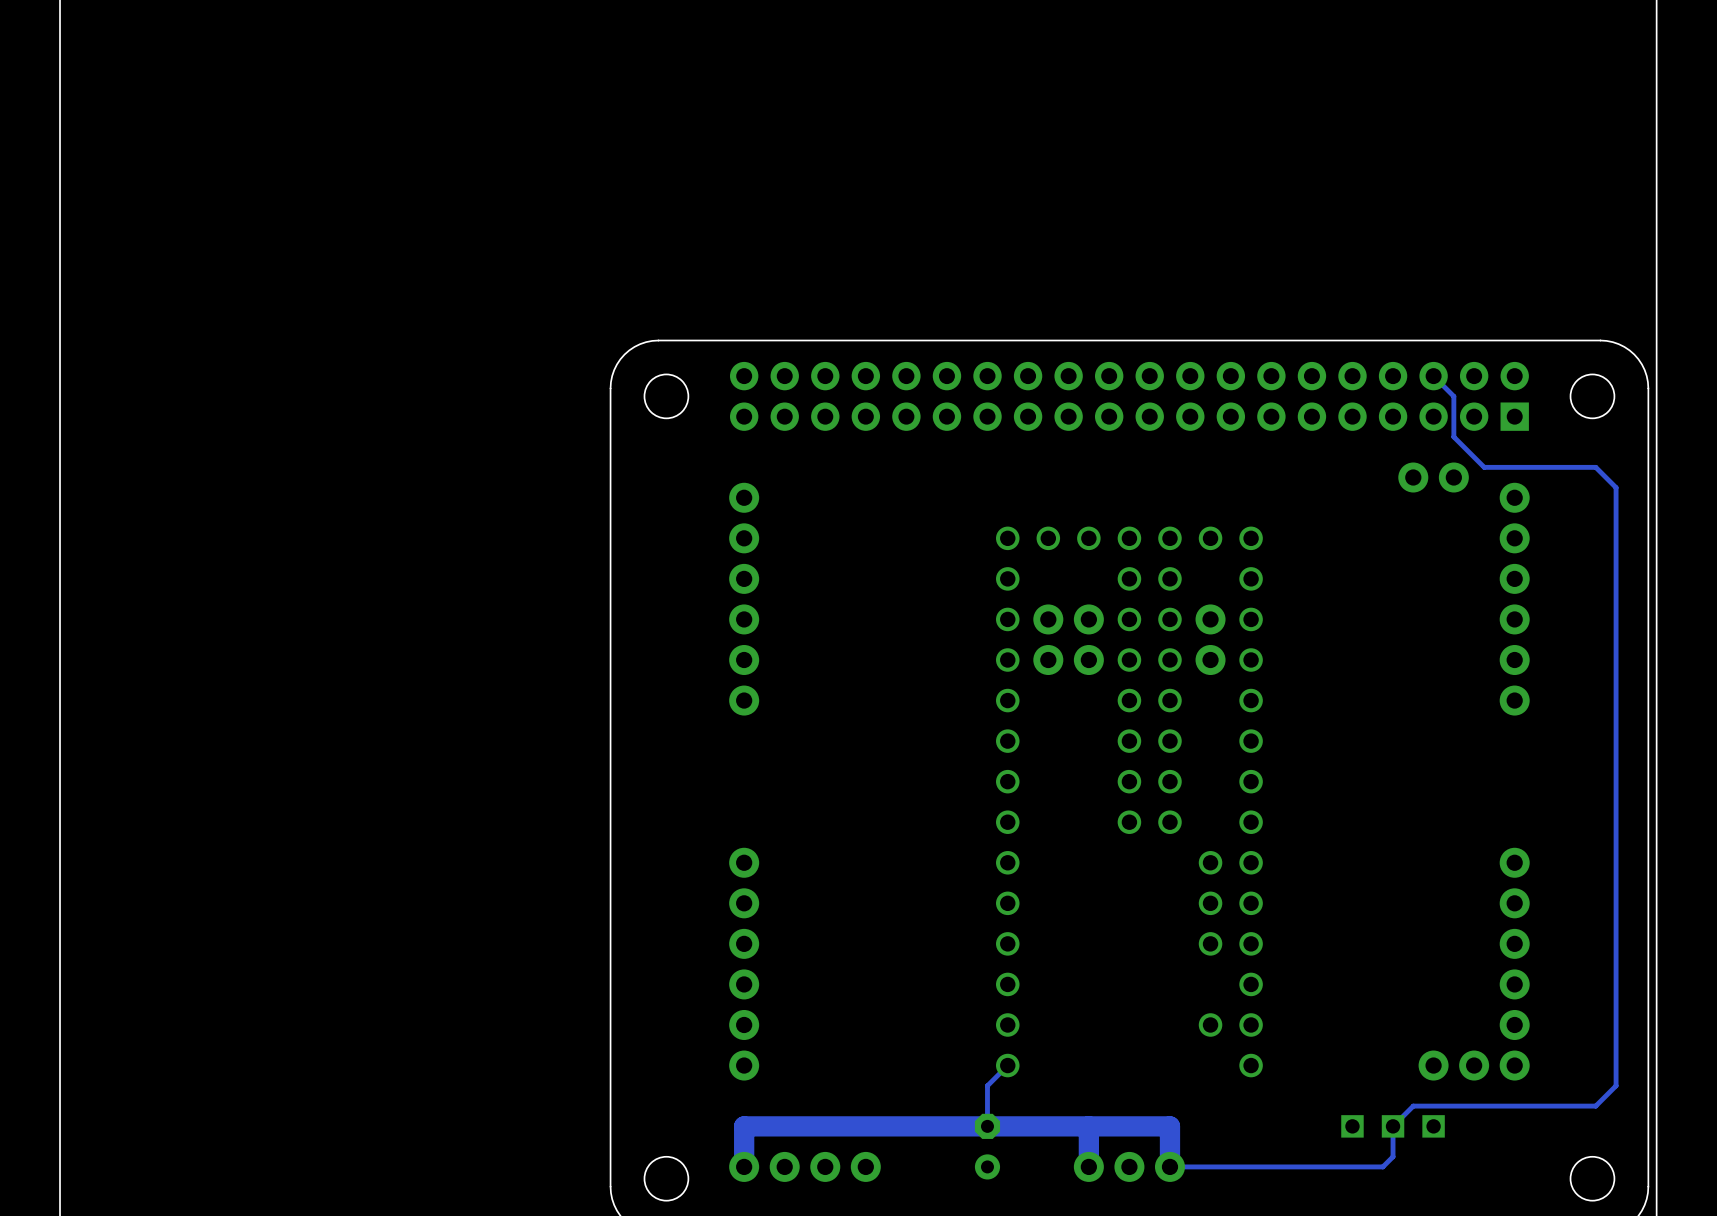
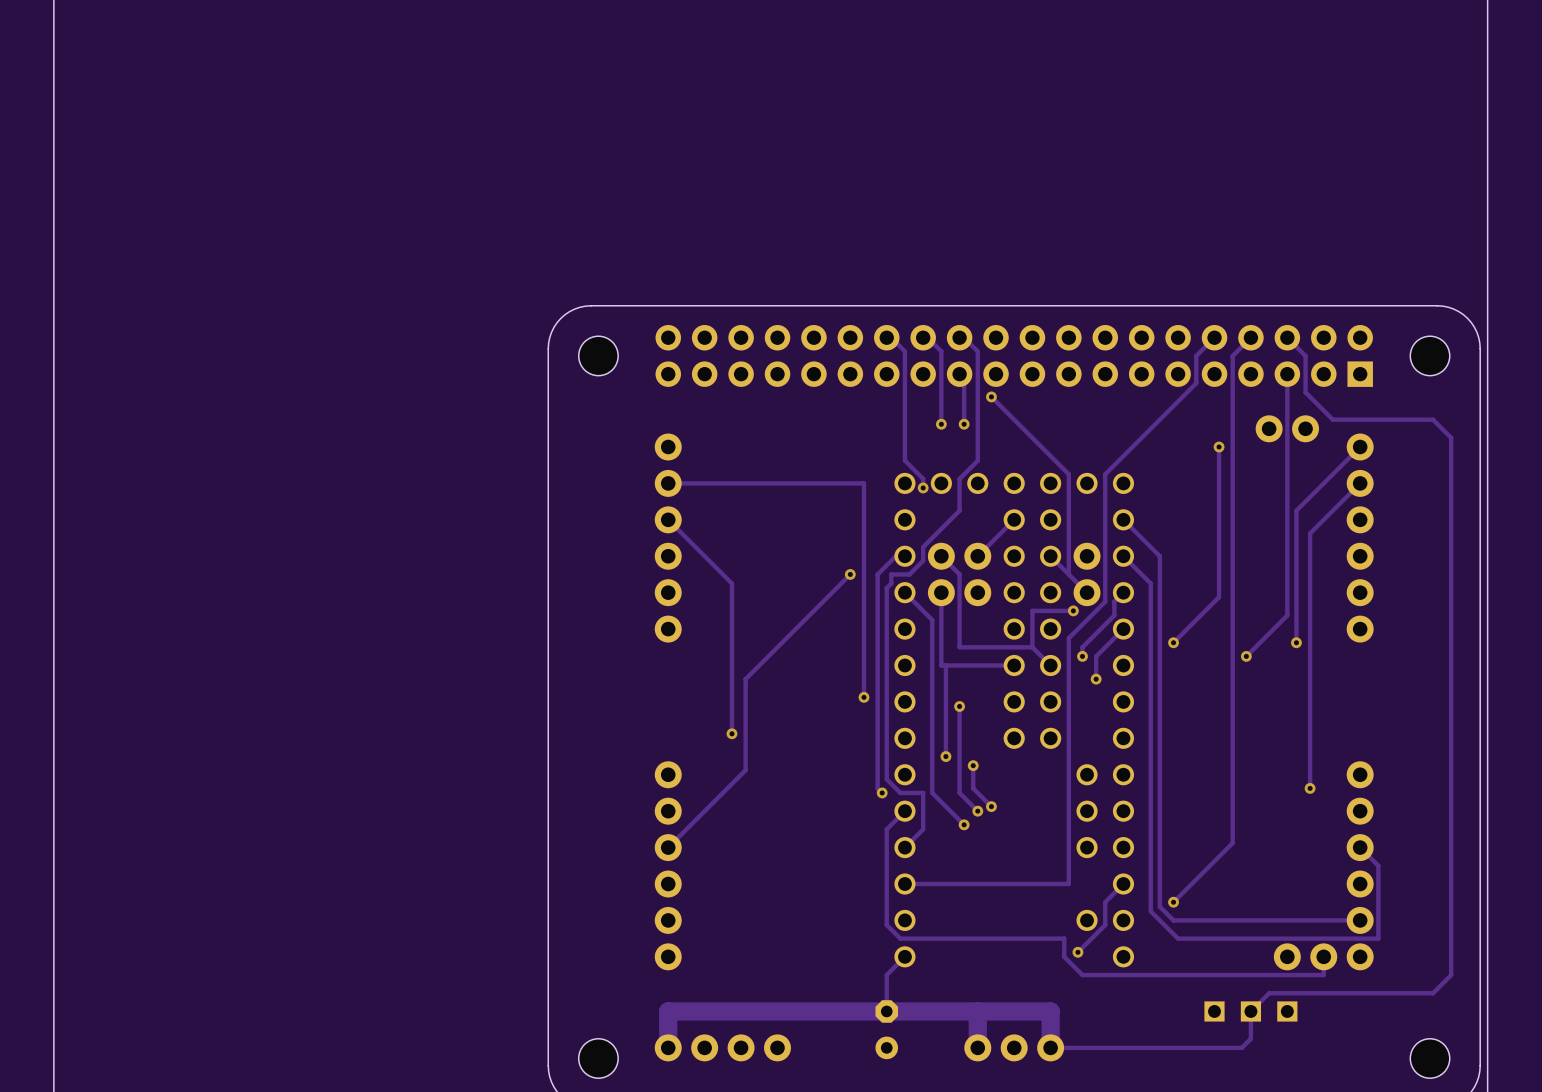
track: none -> (886, 337) (891, 337) (904, 351) (904, 460) (923, 478) (923, 487)
track: none -> (923, 337) (927, 337) (941, 351) (941, 424)
track: none -> (959, 337) (964, 337) (977, 351) (977, 460) (959, 478) (959, 510) (923, 547) (923, 560) (909, 574) (891, 574) (891, 583) (886, 588) (886, 779) (900, 792) (923, 792) (923, 829) (904, 847)
track: none -> (1214, 337) (1196, 355) (1196, 383) (1105, 474) (1105, 601) (1068, 638) (1068, 884) (904, 884)
track: none -> (1250, 337) (1232, 355) (1232, 843) (1173, 902)
track: none -> (959, 374) (964, 374) (964, 424)
track: none -> (1287, 374) (1287, 615) (1246, 656)
track: none -> (991, 396) (1068, 474) (1068, 574)
via: none -> (991, 396)
via: none -> (941, 424)
via: none -> (964, 424)
track: none -> (1219, 447) (1219, 597) (1173, 642)
via: none -> (1219, 447)
track: none -> (1360, 447) (1296, 510) (1296, 642)
track: none -> (668, 483) (863, 483) (863, 697)
track: none -> (1360, 483) (1310, 533) (1310, 788)
via: none -> (923, 487)
track: none -> (668, 519) (731, 583) (731, 733)
track: none -> (1014, 519) (977, 556)
track: none -> (1123, 519) (1159, 556) (1159, 906) (1173, 920) (1360, 920)
track: none -> (904, 556) (895, 556) (877, 574) (877, 788) (882, 792)
track: none -> (941, 556) (959, 574) (959, 647) (1032, 647)
track: none -> (1050, 556) (1087, 592)
track: none -> (1123, 556) (1150, 583) (1150, 911) (1178, 938) (1378, 938) (1378, 865) (1360, 847)
track: none -> (850, 574) (745, 679) (745, 770) (668, 847)
via: none -> (850, 574)
track: none -> (904, 592) (932, 619) (932, 792) (964, 824)
track: none -> (941, 592) (941, 665) (1014, 665)
track: none -> (1123, 592) (1114, 601) (1114, 615) (1082, 647) (1082, 656)
track: none -> (1073, 610) (1032, 610) (1032, 647)
via: none -> (1073, 610)
track: none -> (1123, 629) (1096, 656) (1096, 679)
via: none -> (1173, 642)
via: none -> (1296, 642)
track: none -> (1032, 647) (1050, 665)
via: none -> (1082, 656)
via: none -> (1246, 656)
track: none -> (945, 665) (945, 756)
via: none -> (1096, 679)
via: none -> (863, 697)
track: none -> (959, 706) (959, 792) (977, 811)
via: none -> (959, 706)
via: none -> (731, 733)
via: none -> (945, 756)
track: none -> (973, 765) (973, 788) (991, 806)
via: none -> (973, 765)
via: none -> (1310, 788)
via: none -> (882, 792)
via: none -> (991, 806)
track: none -> (904, 811) (886, 829) (886, 924) (900, 938) (1064, 938) (1064, 956) (1082, 975) (1323, 975) (1323, 956)
via: none -> (977, 811)
via: none -> (964, 824)
track: none -> (1123, 884) (1105, 902) (1105, 924) (1077, 952)
via: none -> (1173, 902)
via: none -> (1077, 952)

